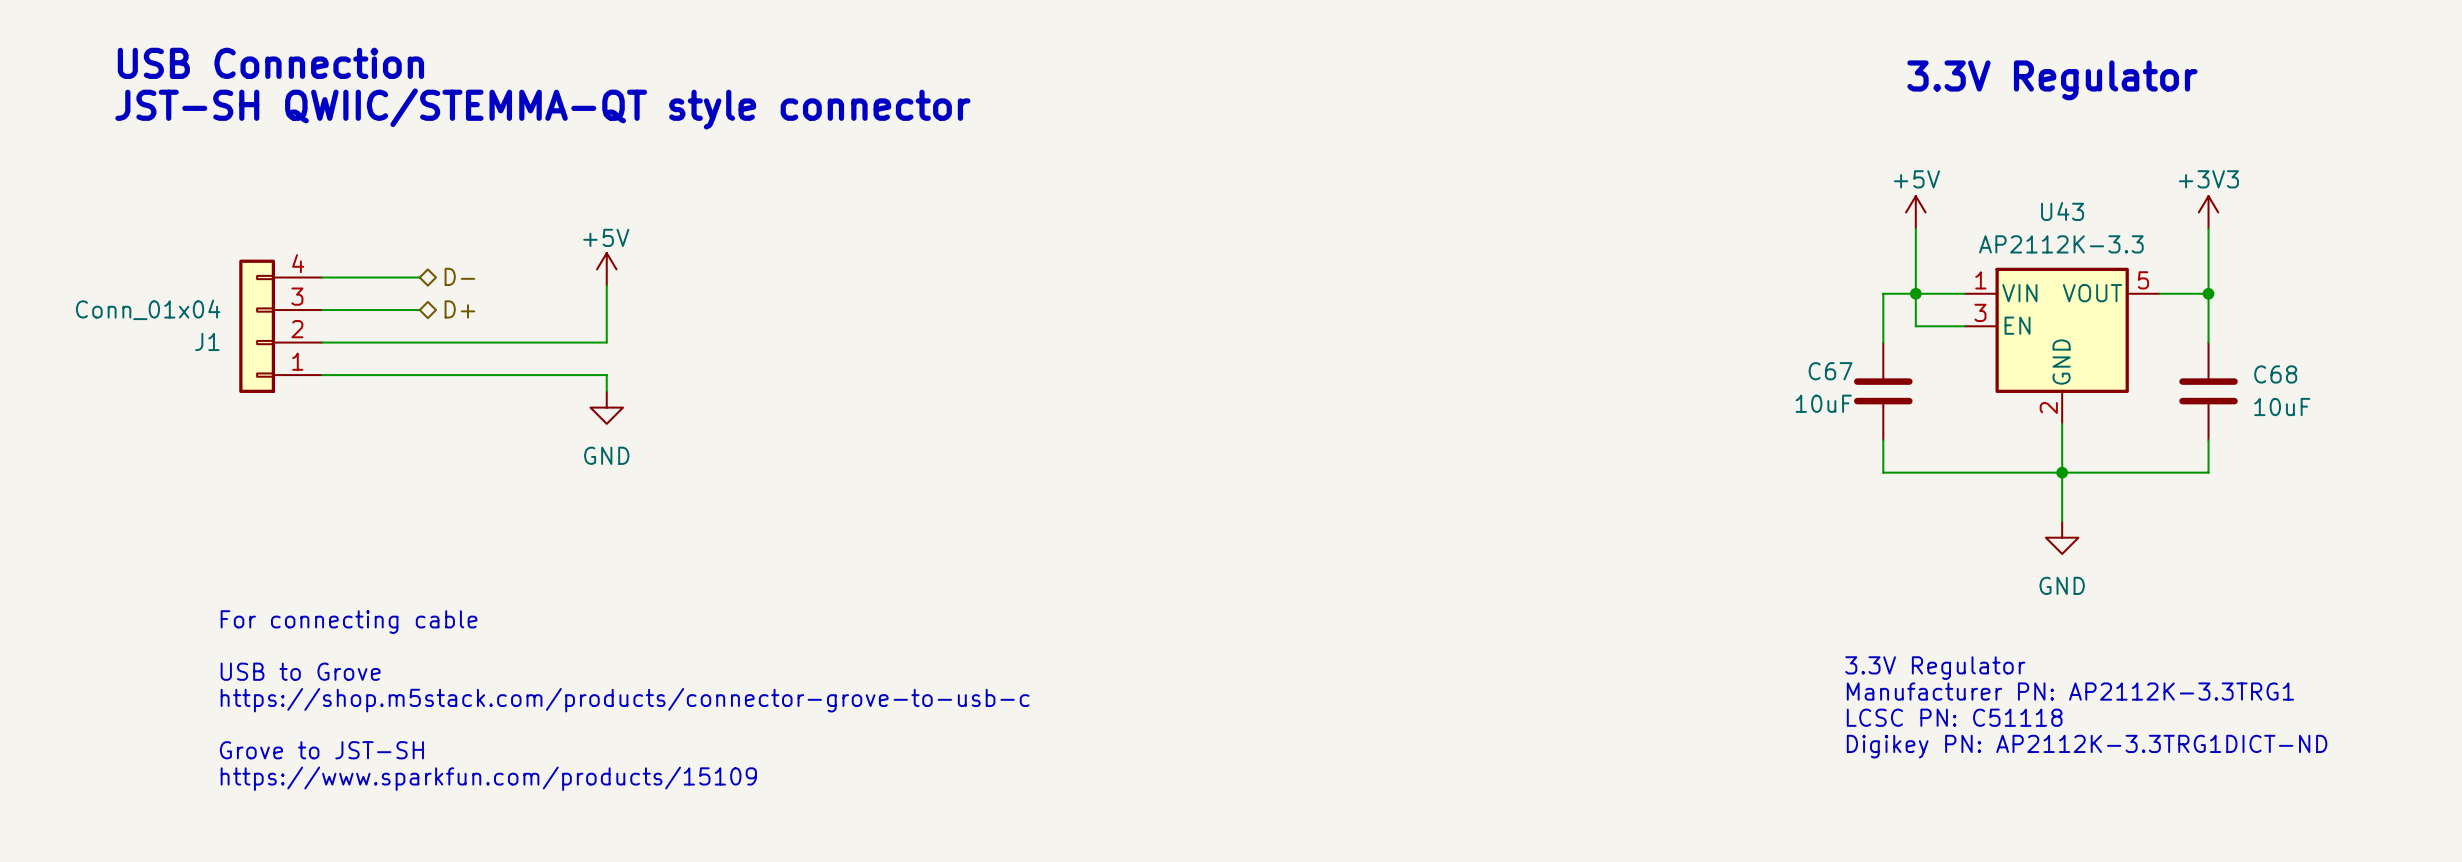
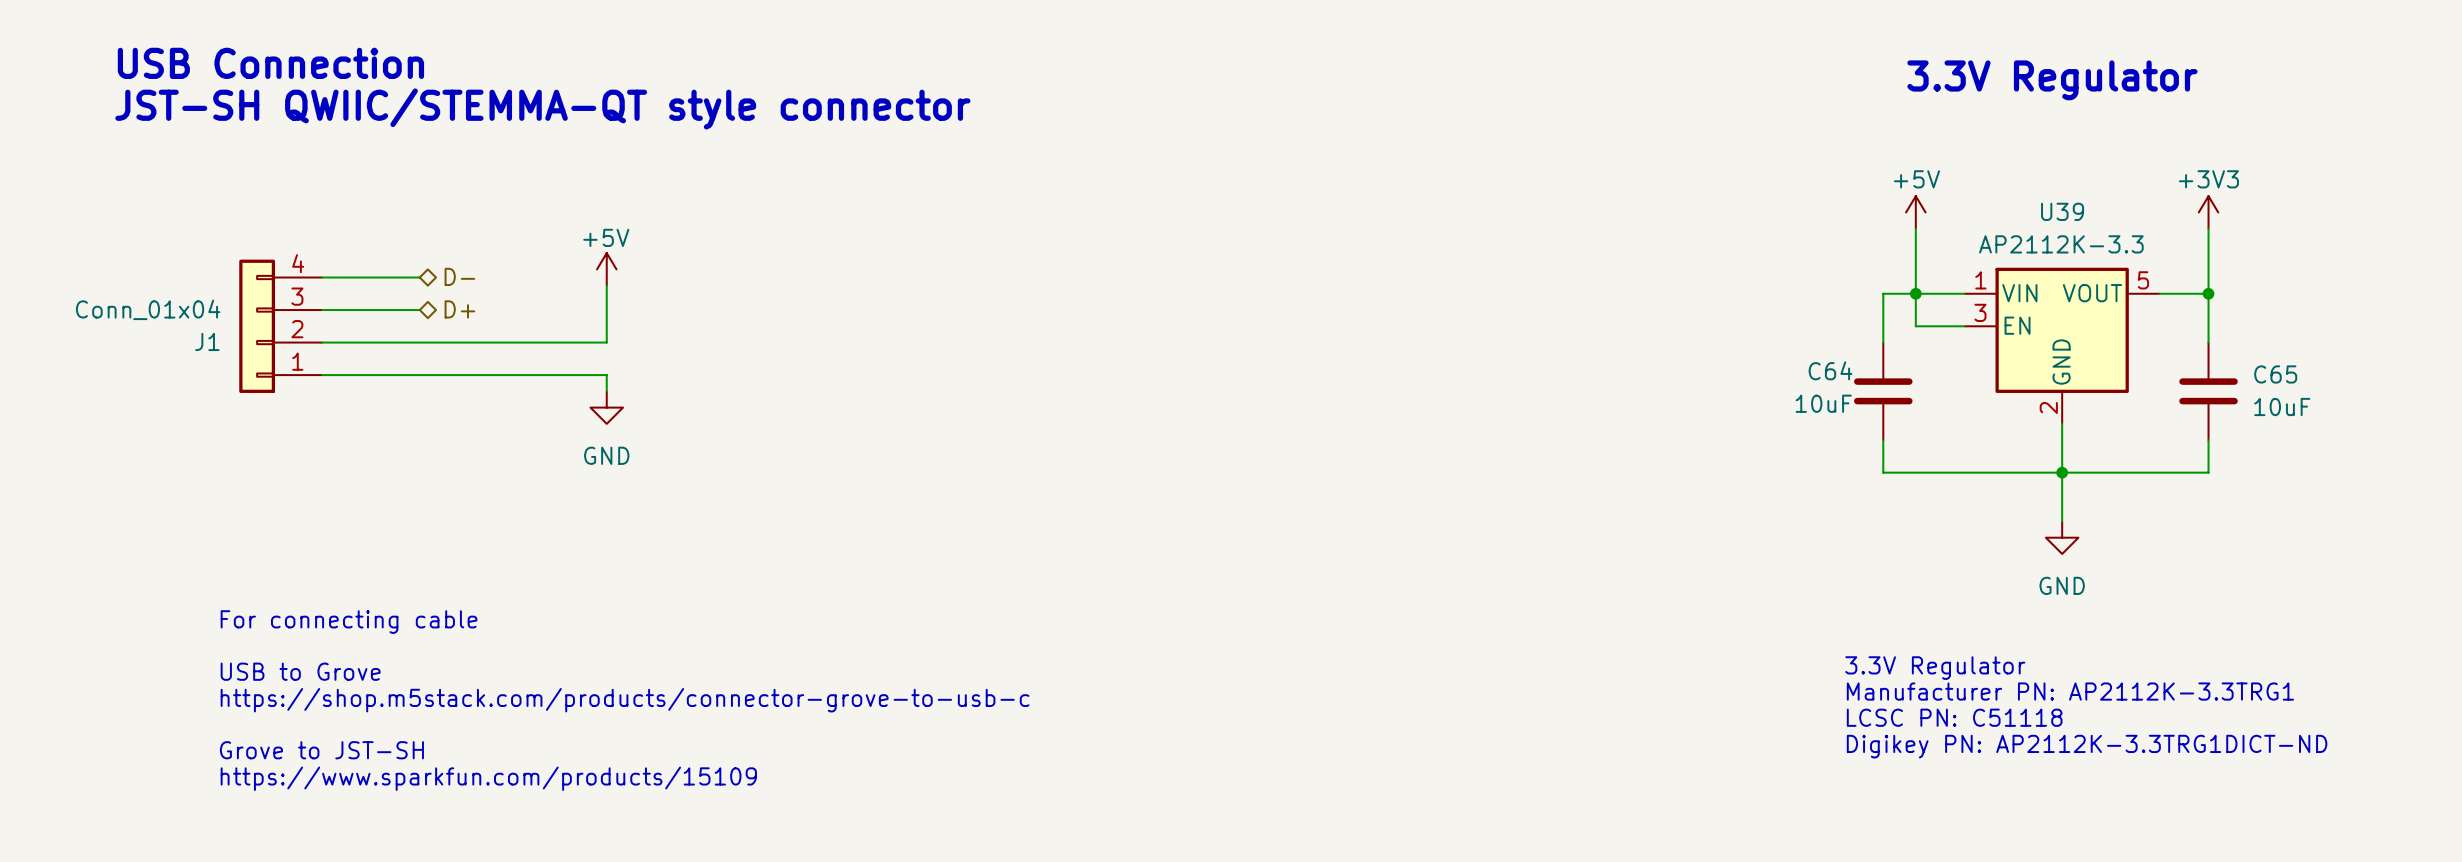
U43 name: U43 (2062, 211) -> U39 (2062, 211)
C67 name: C67 (1830, 371) -> C64 (1830, 370)
C68 name: C68 (2275, 374) -> C65 (2275, 374)

